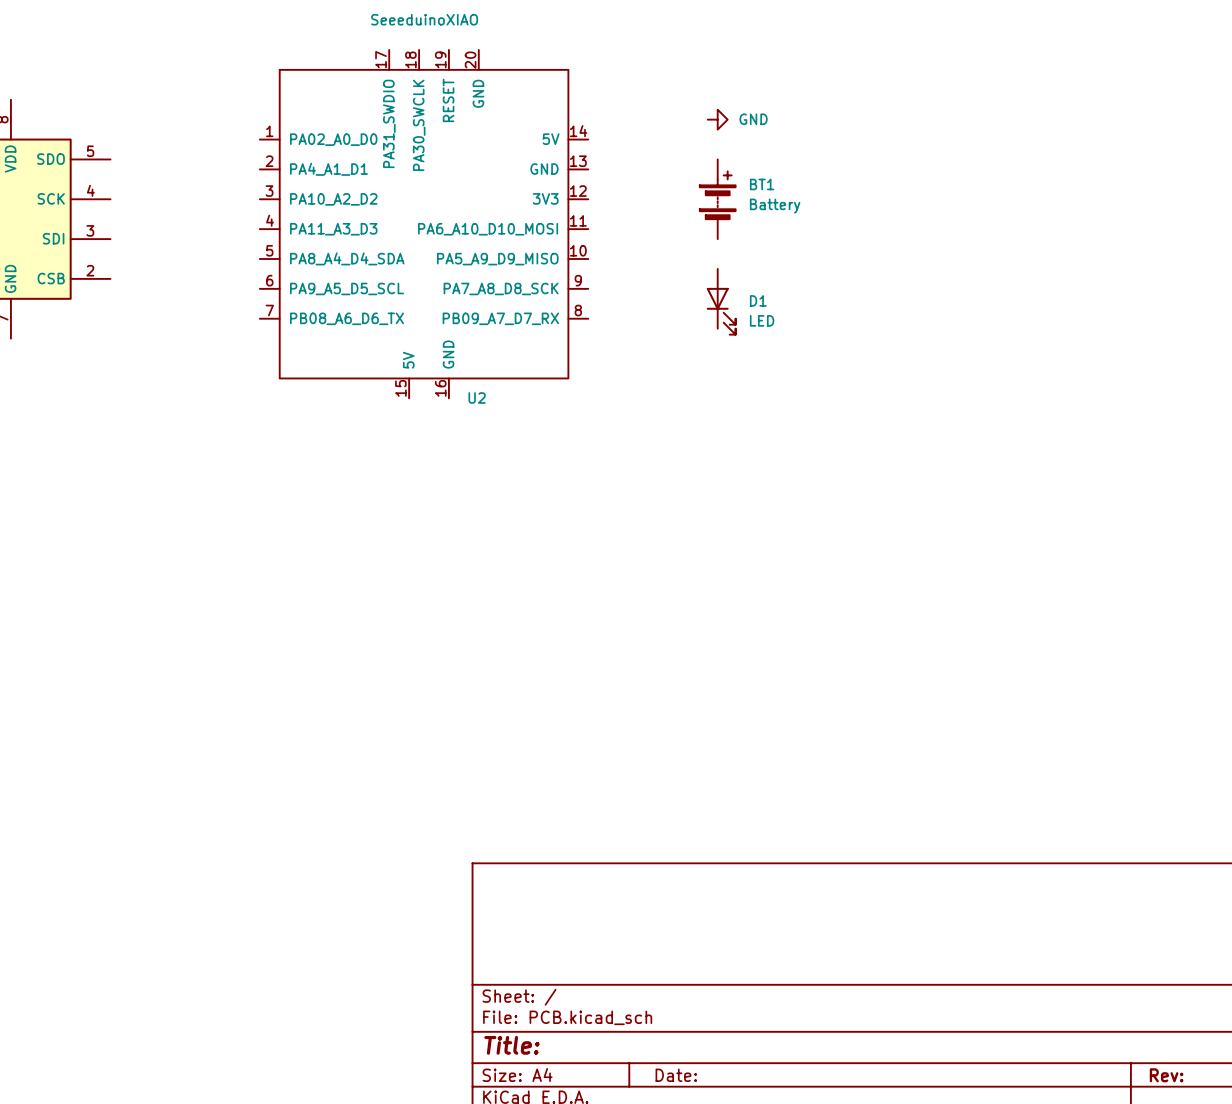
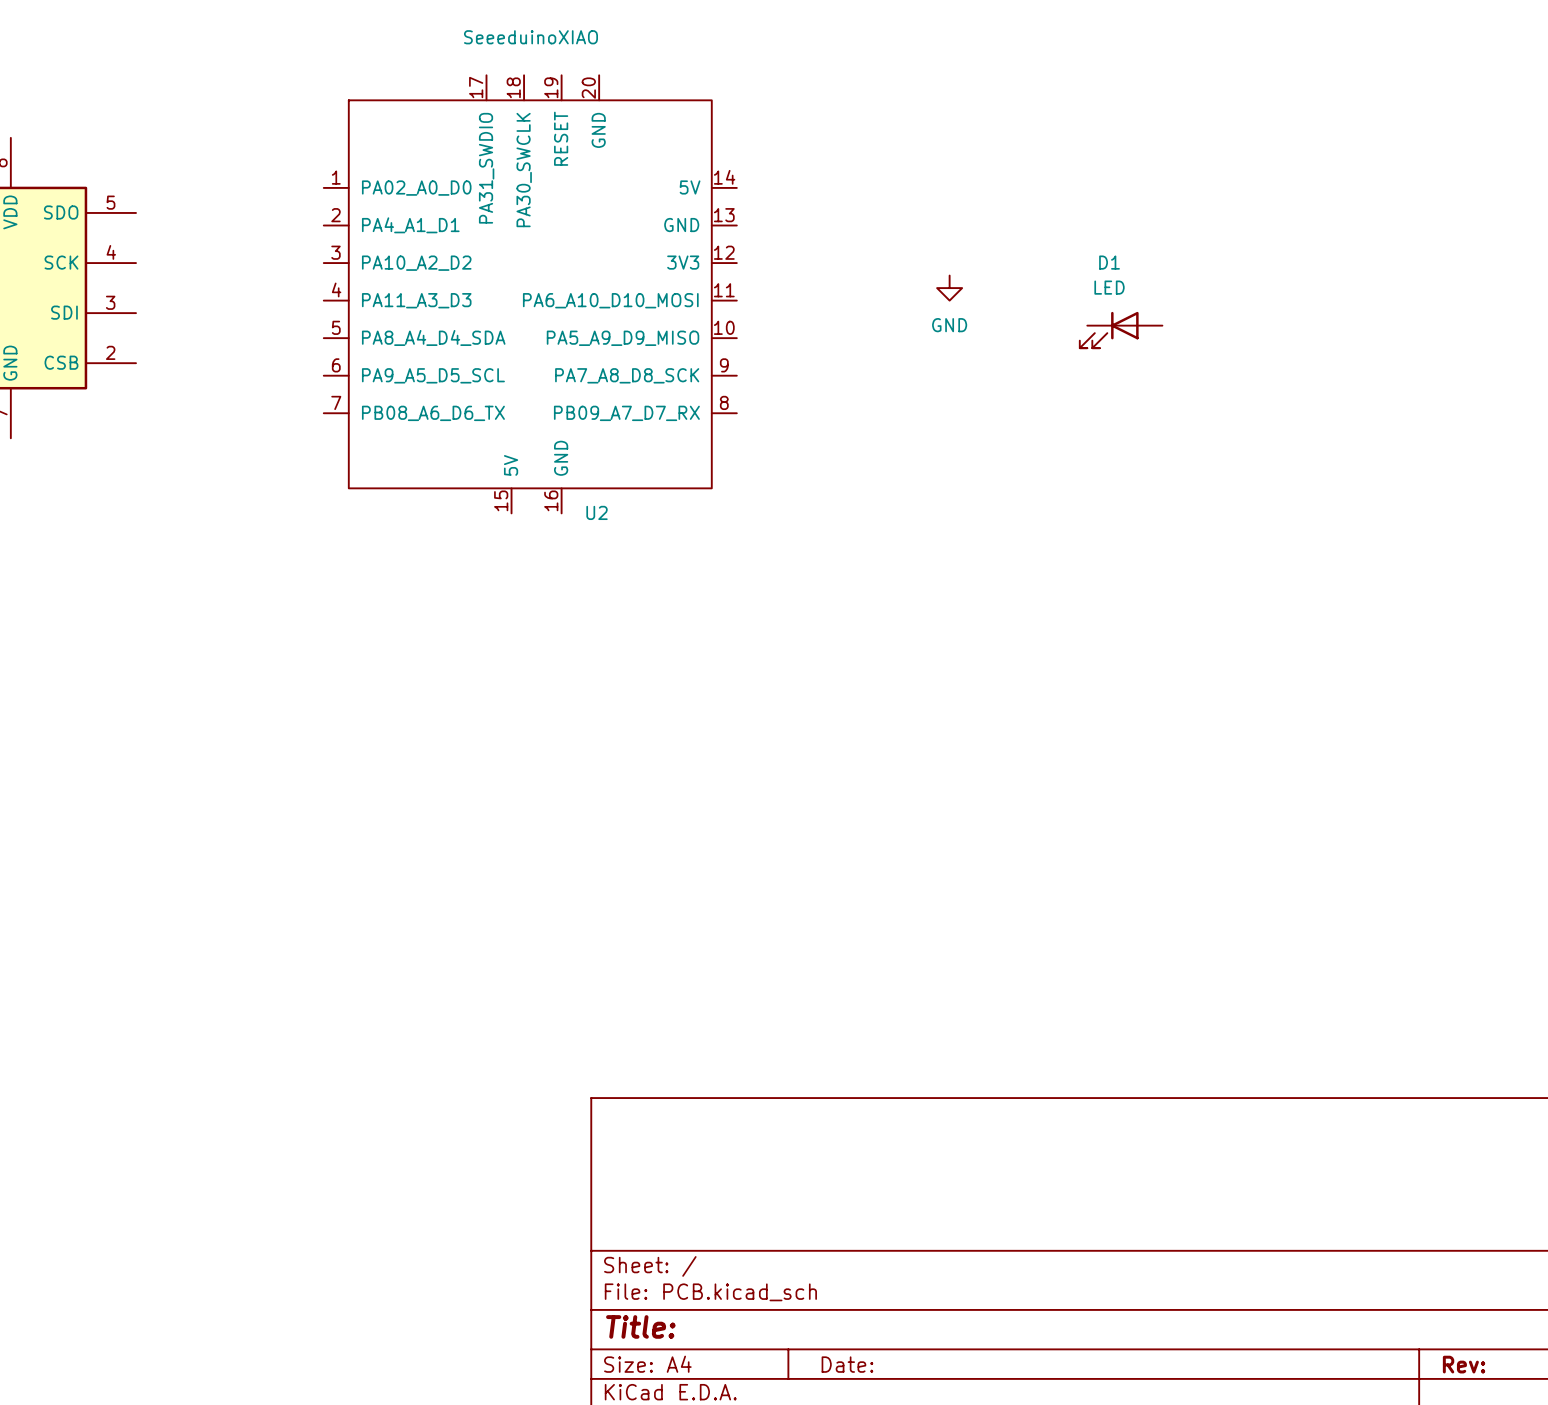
power symbol rotation: 0° (717, 119) -> 90° clockwise (949, 288)
power symbol position: GND (717, 119) -> GND (949, 288)
BT1: Battery (717, 199) -> none
D1 name position: D1 (758, 300) -> D1 (1109, 262)
D1 position: (721, 301) -> (1121, 330)
D1 rotation: 0° (721, 311) -> 90° clockwise (1109, 330)
D1 value position: LED (762, 320) -> LED (1109, 287)

